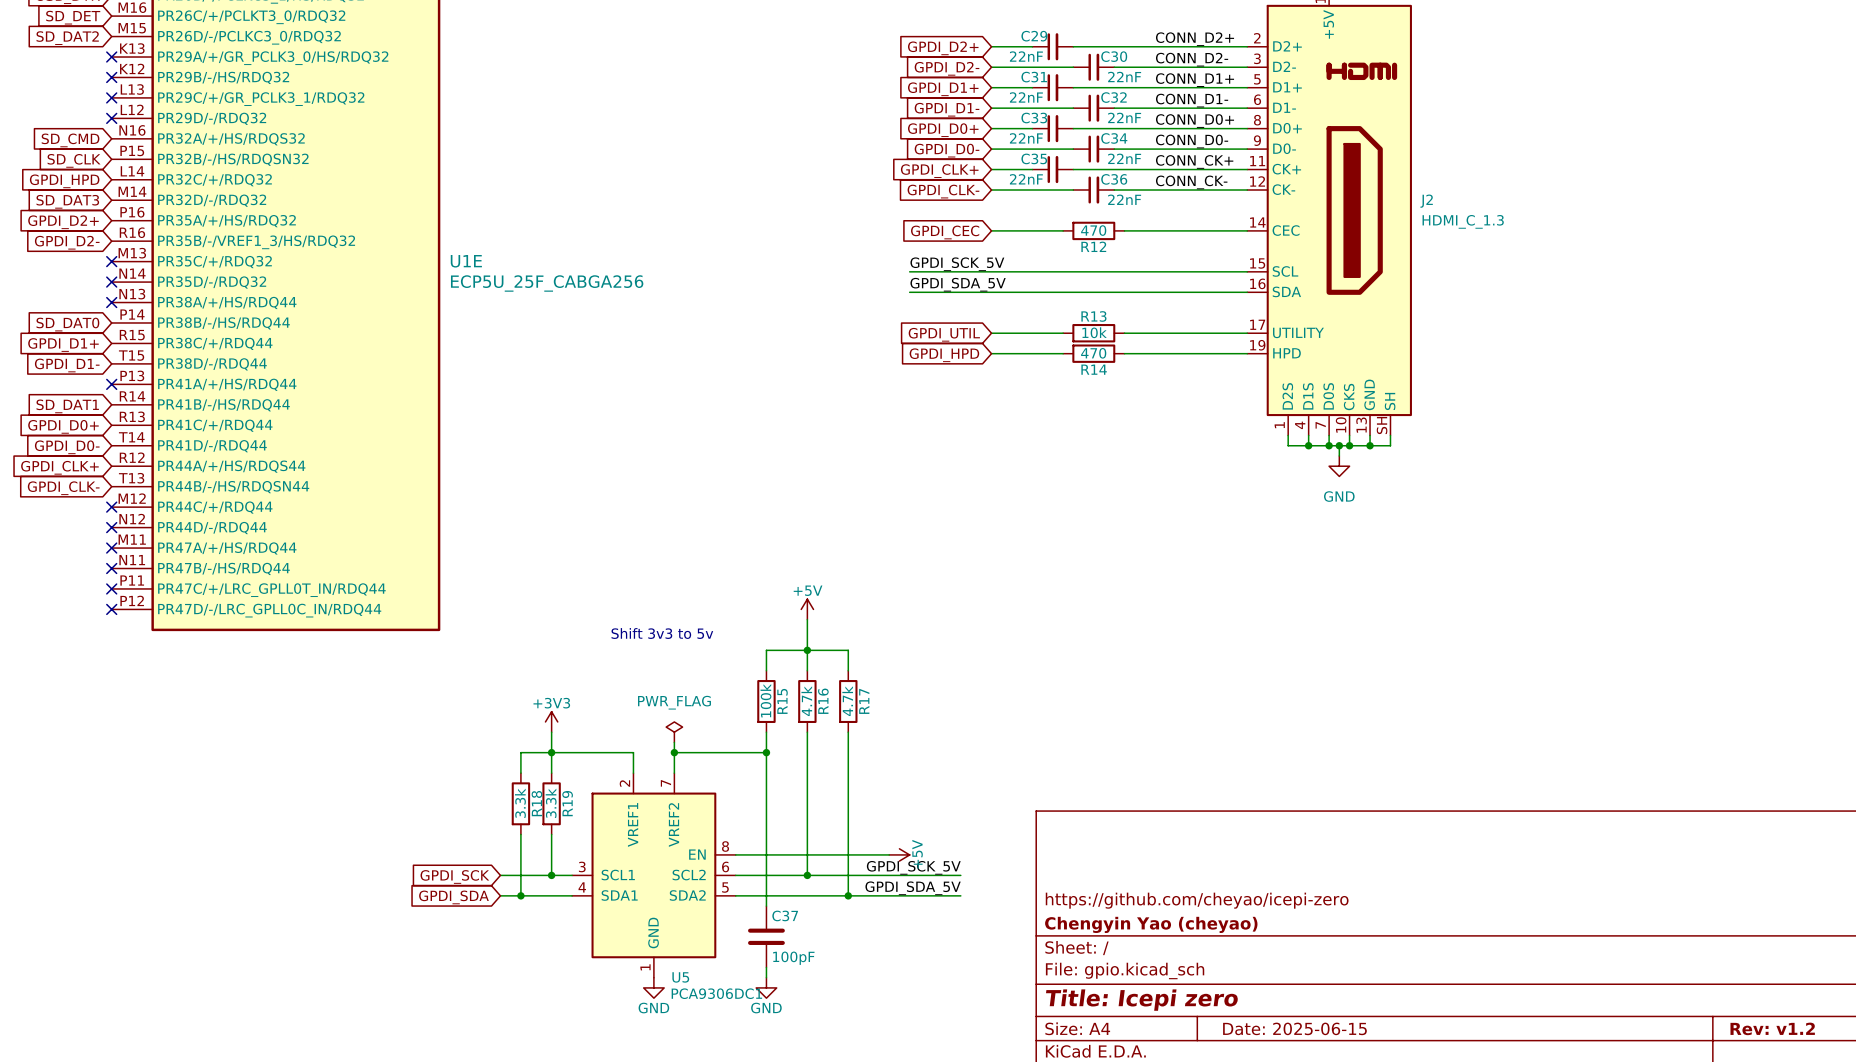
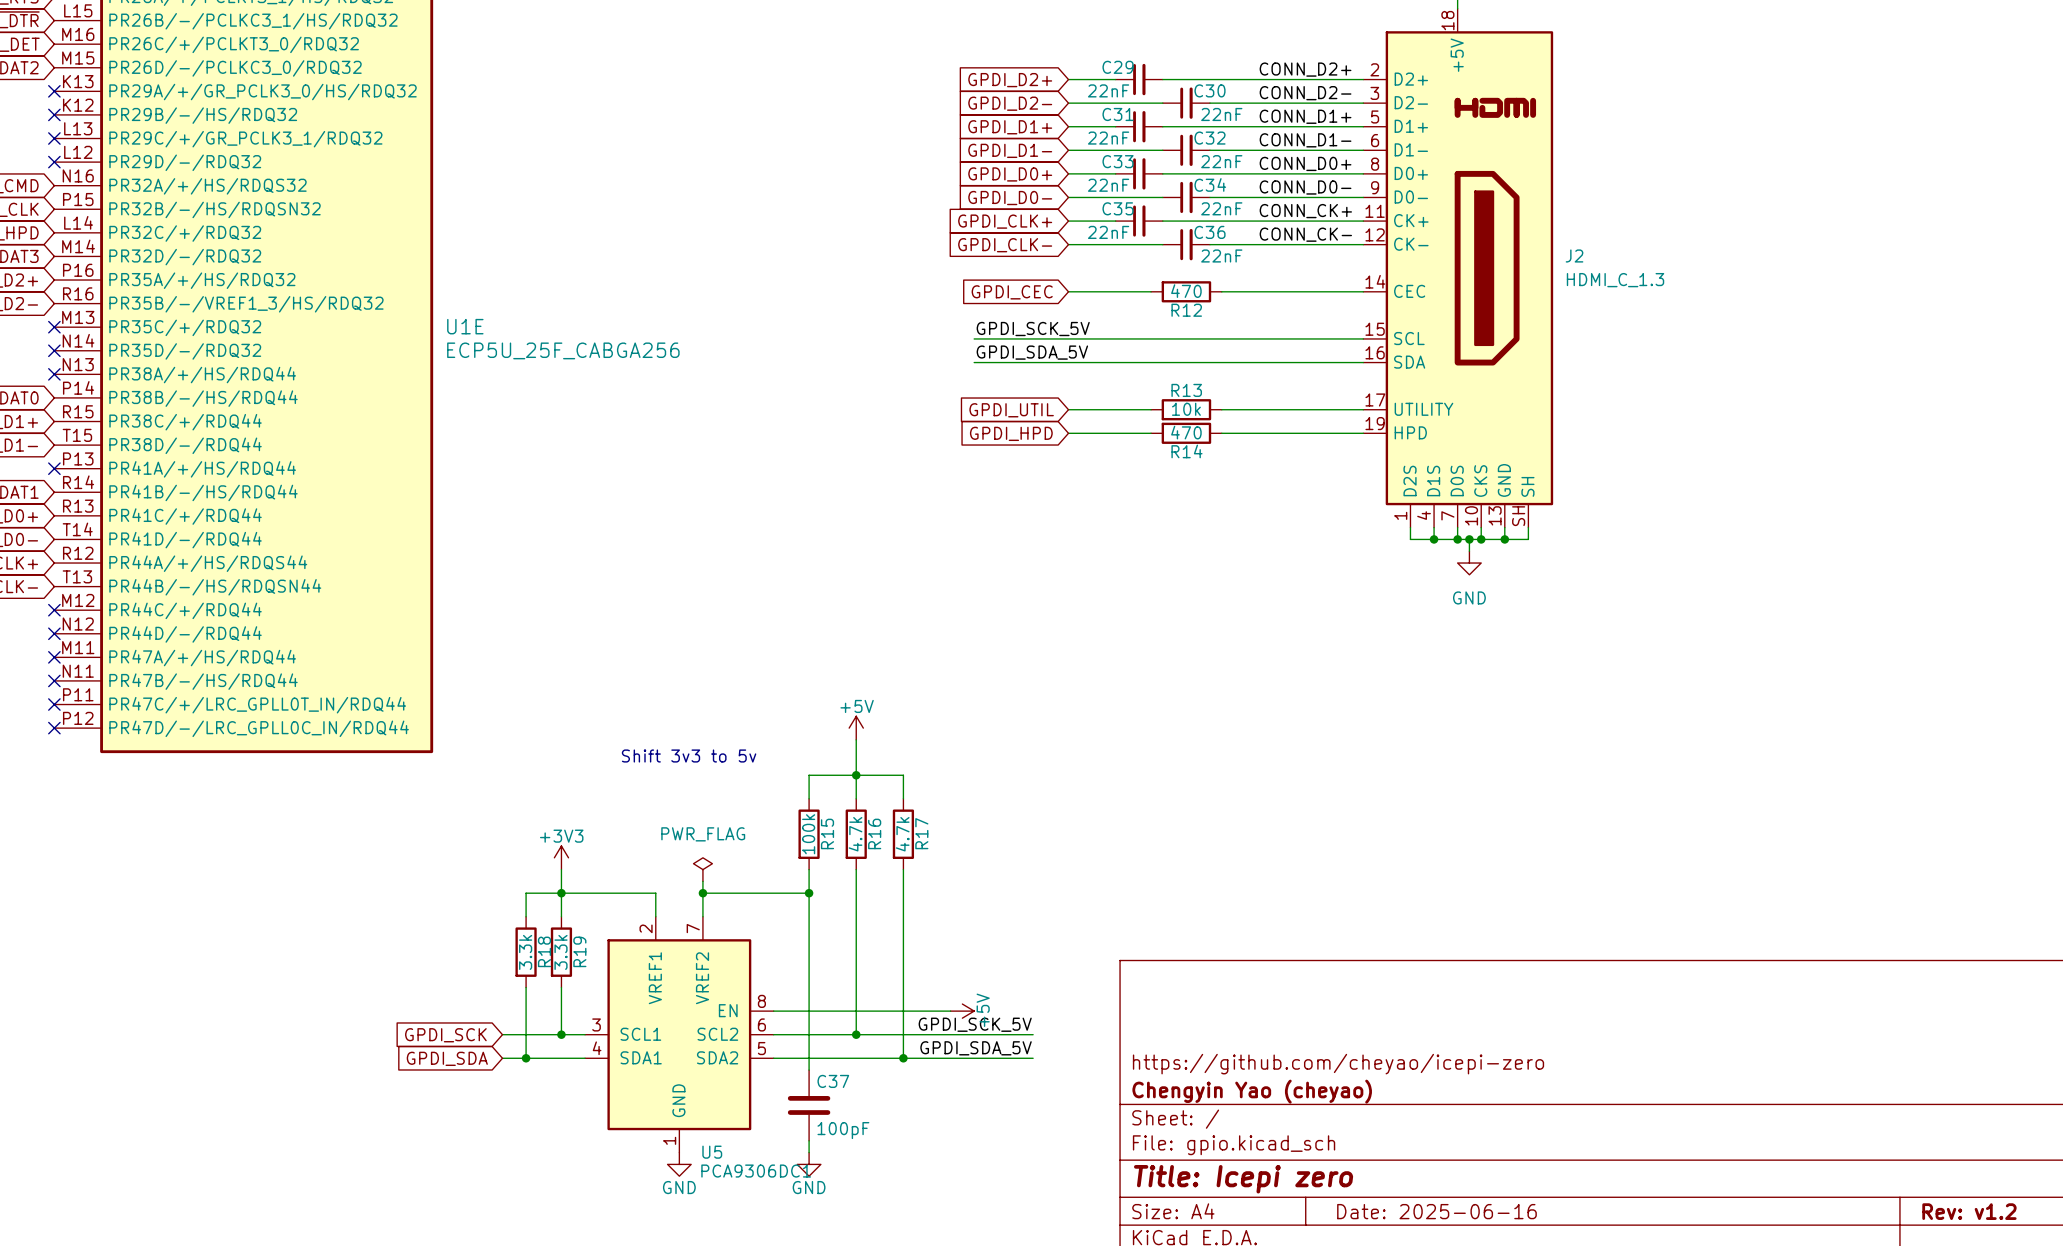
title block: Date: 2025-06-15 (1294, 1028) -> Date: 2025-06-16 (1436, 1211)

